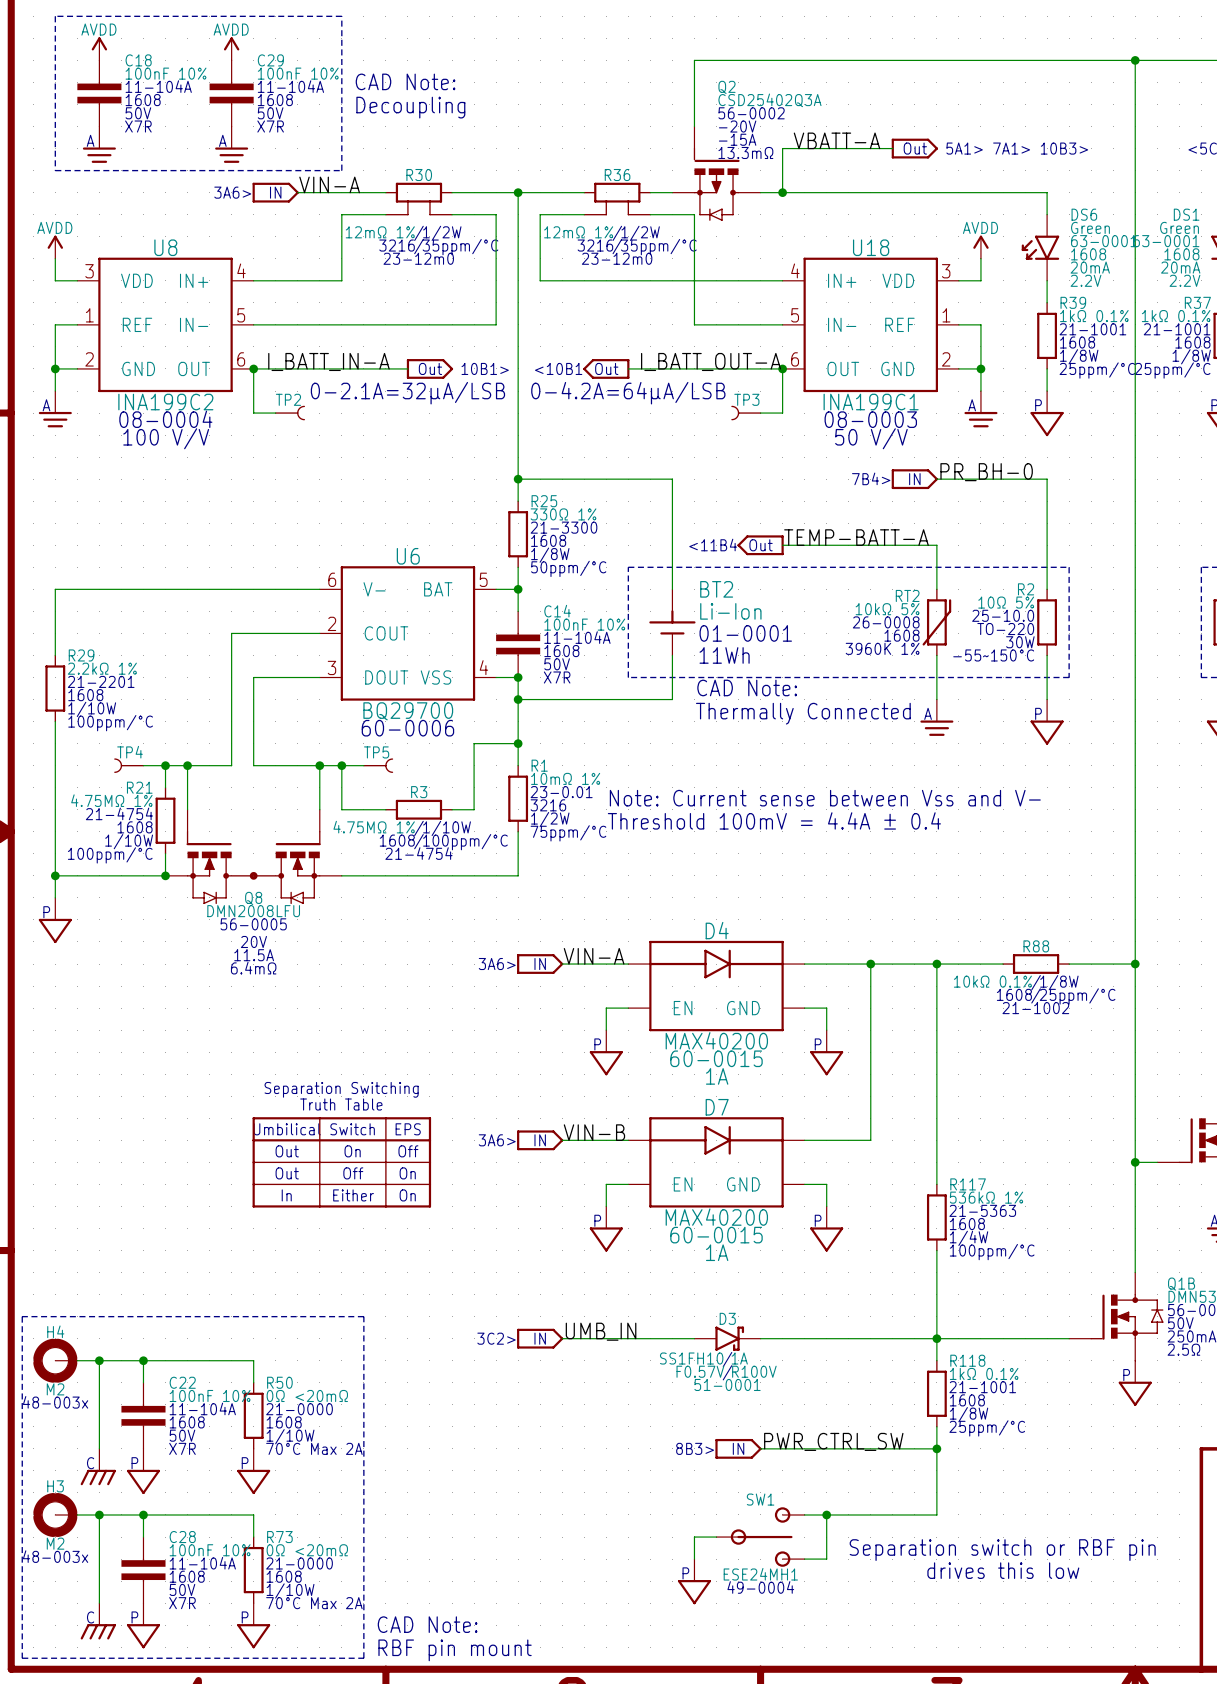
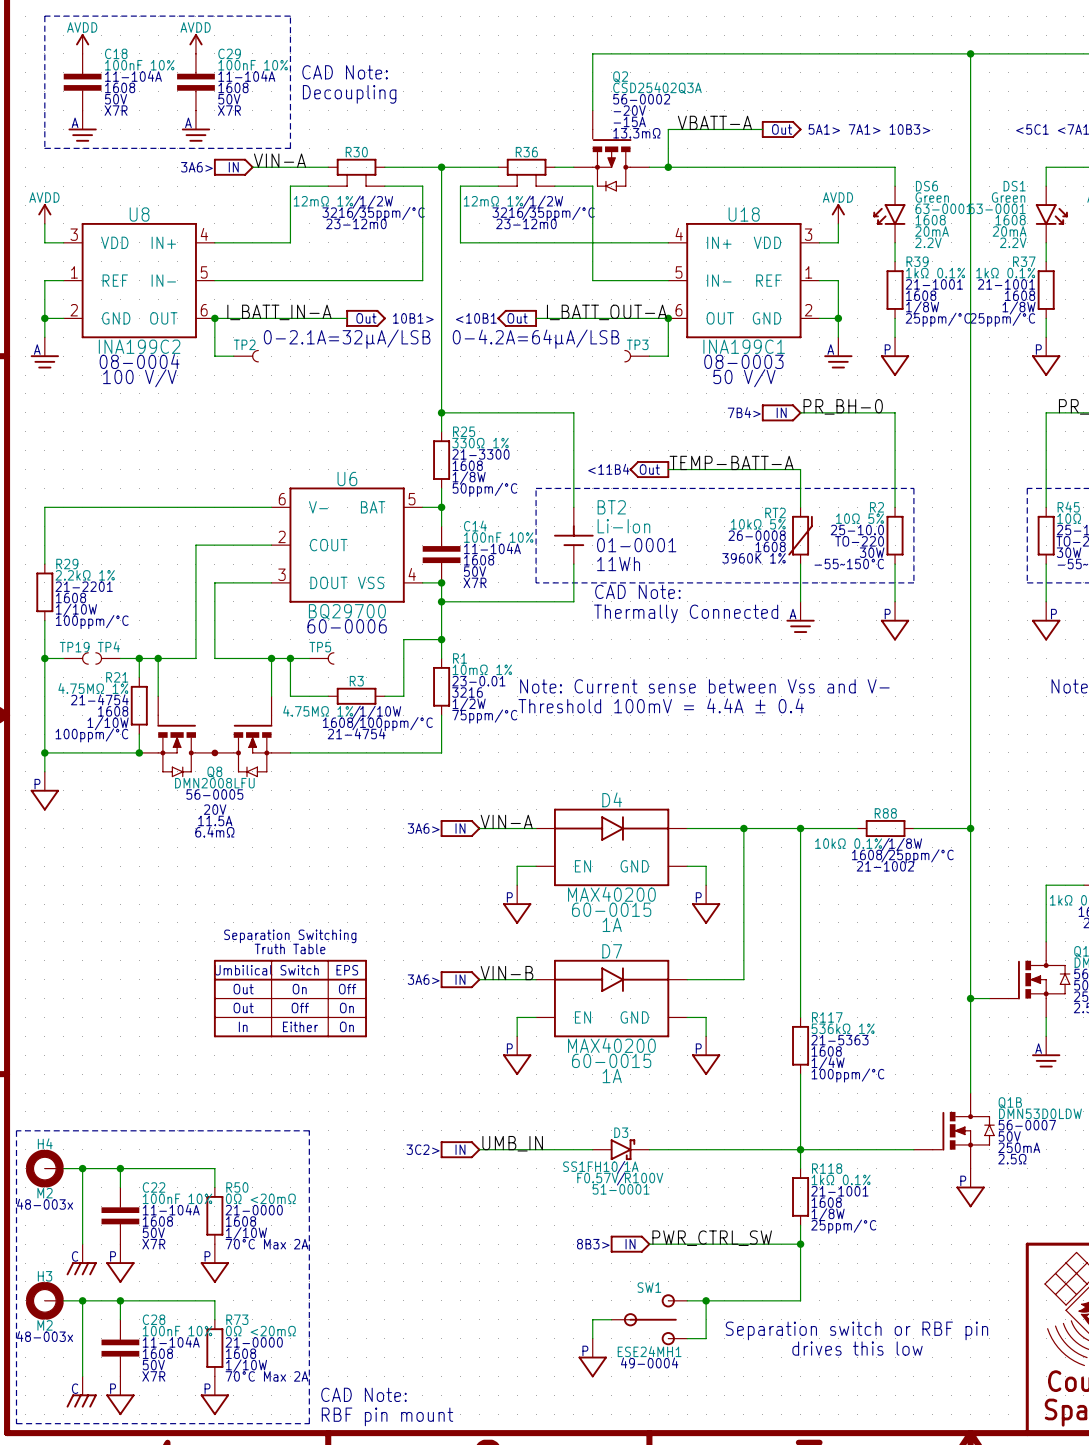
wire: none -> (44, 658) (63, 658)
junction: none -> (44, 658)
TP19: none -> (76, 658)

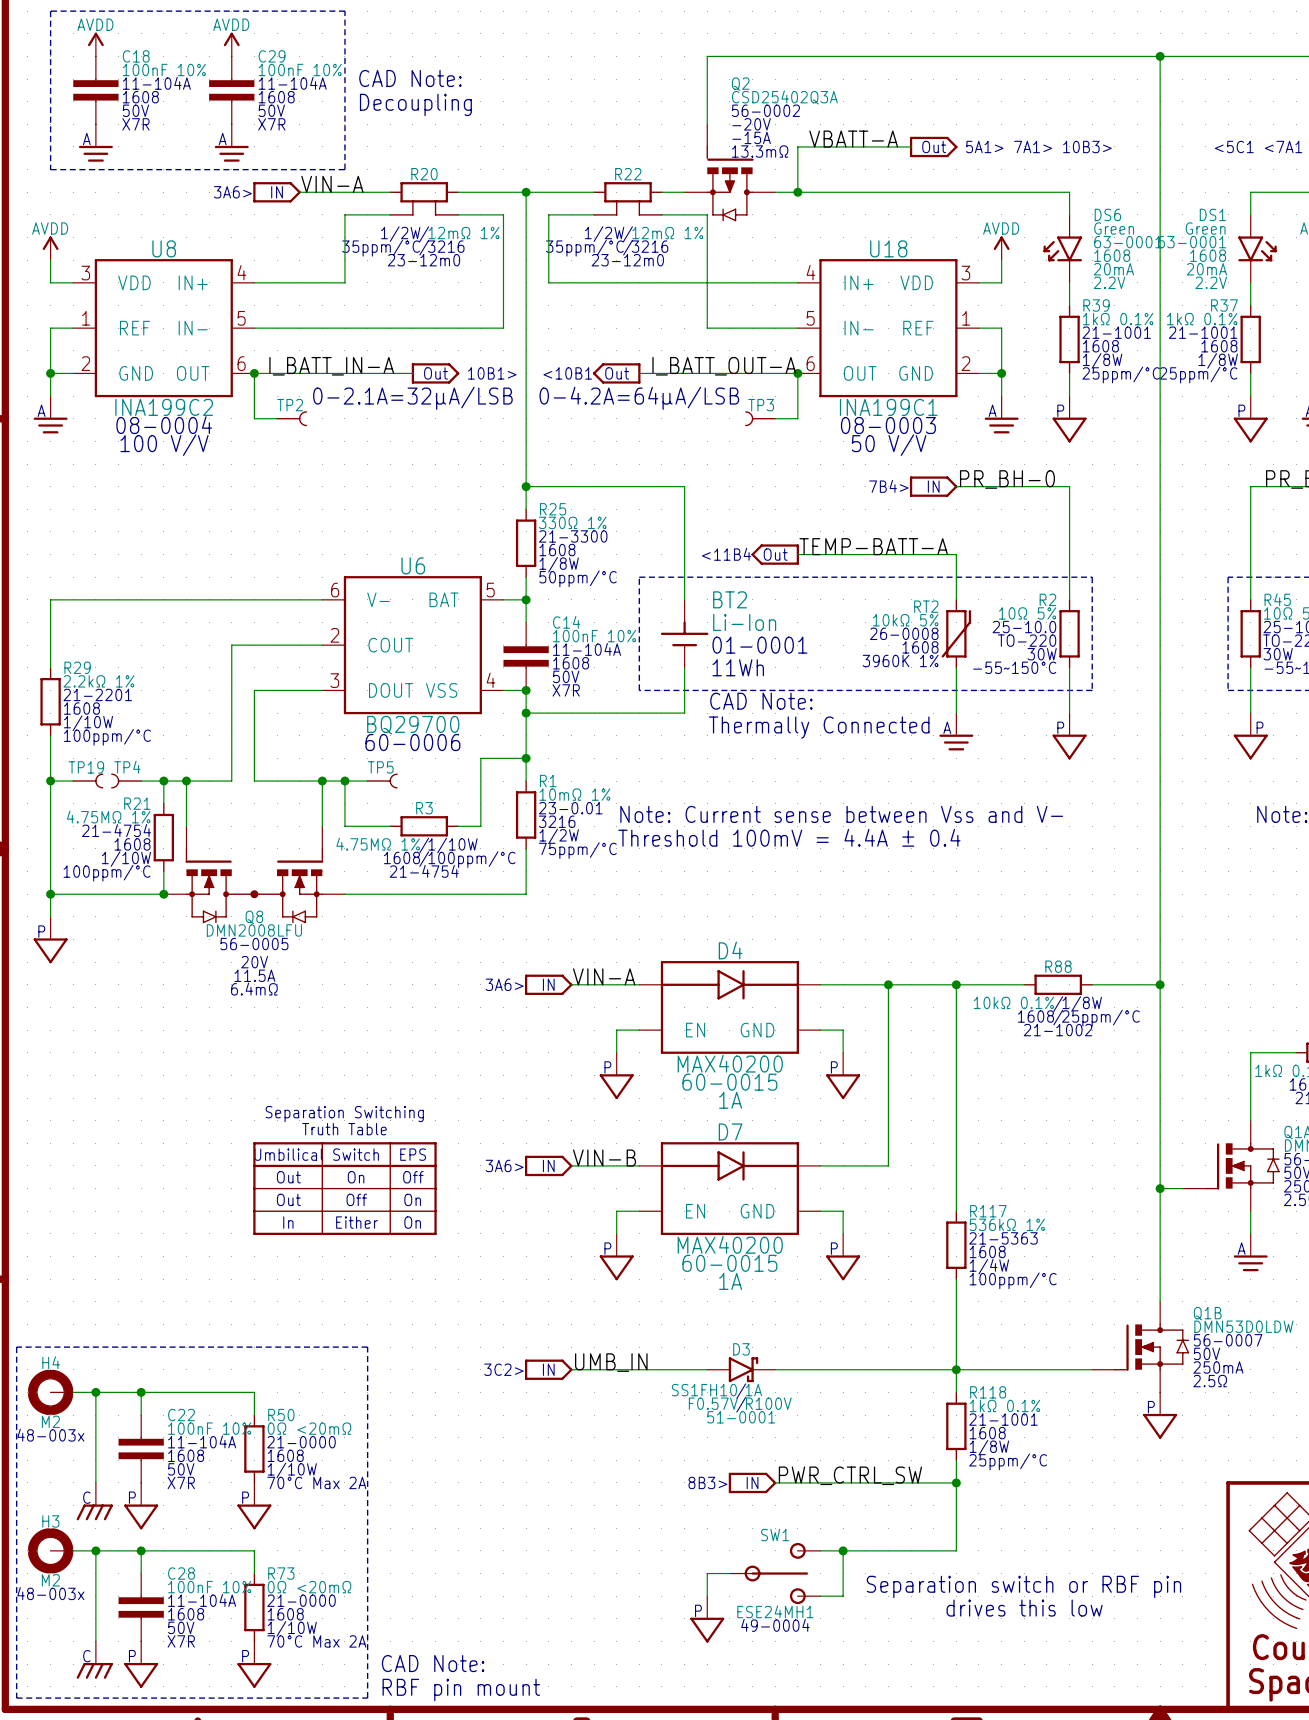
R30 name: R30 (356, 152) -> R20 (424, 174)
R36 name: R36 (526, 152) -> R22 (628, 174)
R30 value position: 12mΩ 1% (323, 201) -> 12mΩ 1% (463, 233)
R36 value position: 12mΩ 1% (493, 201) -> 12mΩ 1% (667, 233)
R30 text position: 1/2W (376, 202) -> 1/2W (400, 234)
R36 text position: 1/2W (546, 202) -> 1/2W (604, 234)
R30 text position: 3216 (337, 212) -> 3216 (446, 246)
R36 text position: 3216 (507, 212) -> 3216 (650, 246)
R30 text position: 35ppm/°C (392, 213) -> 35ppm/°C (381, 248)
R36 text position: 35ppm/°C (562, 213) -> 35ppm/°C (584, 248)

